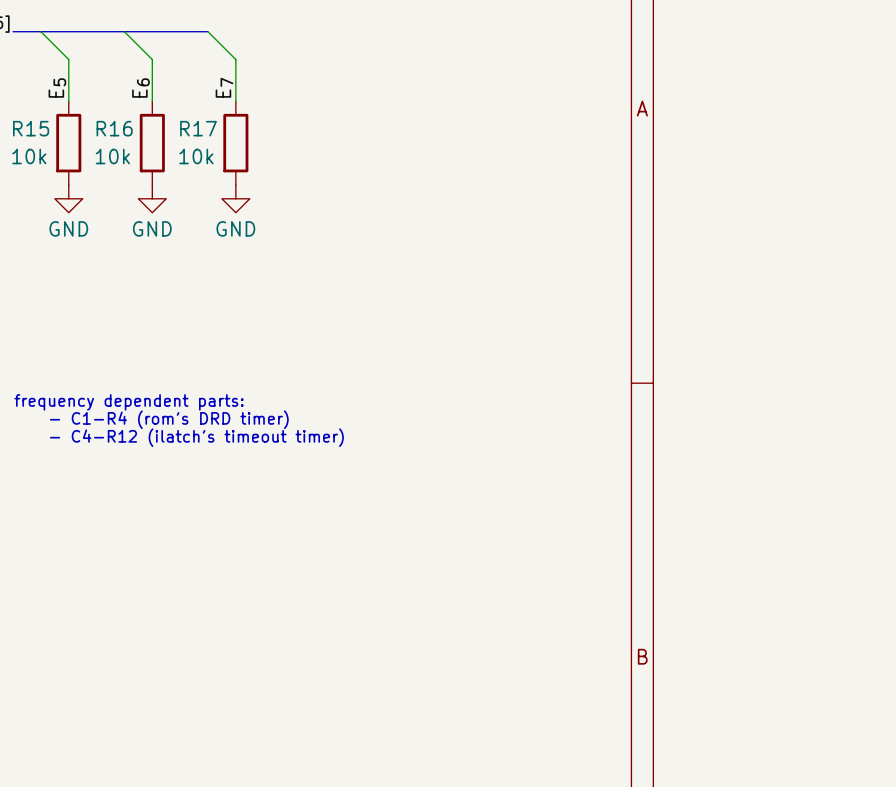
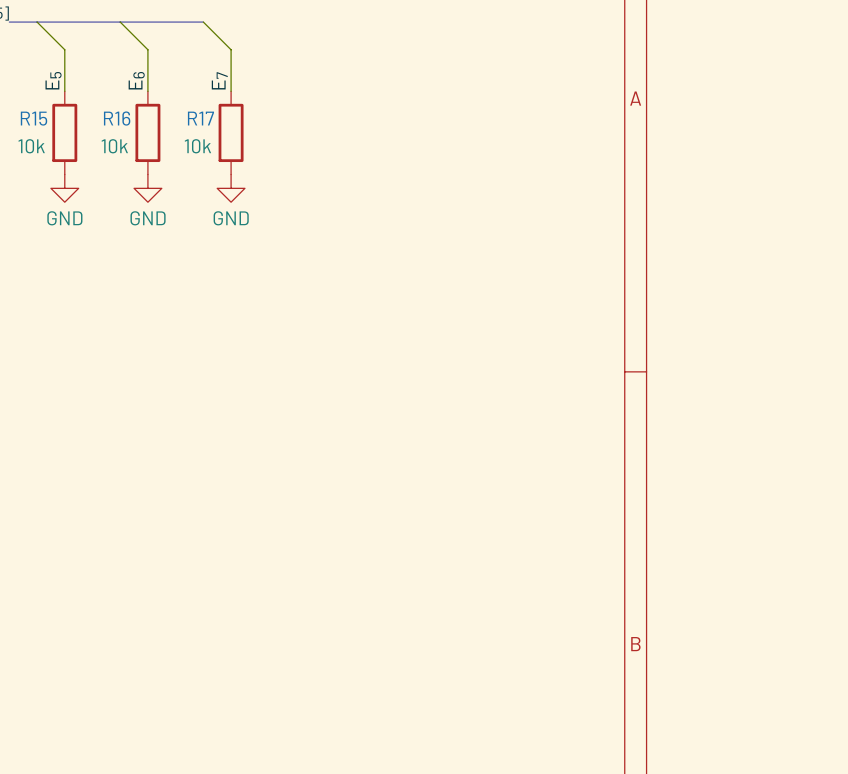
text: frequency dependent parts: (129, 402) -> none
text: - C1-R4 (rom's DRD timer) (169, 419) -> none
text: - C4-R12 (ilatch's timeout timer) (196, 437) -> none

